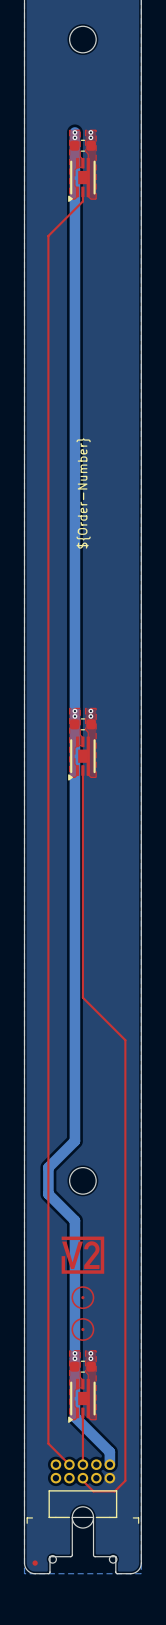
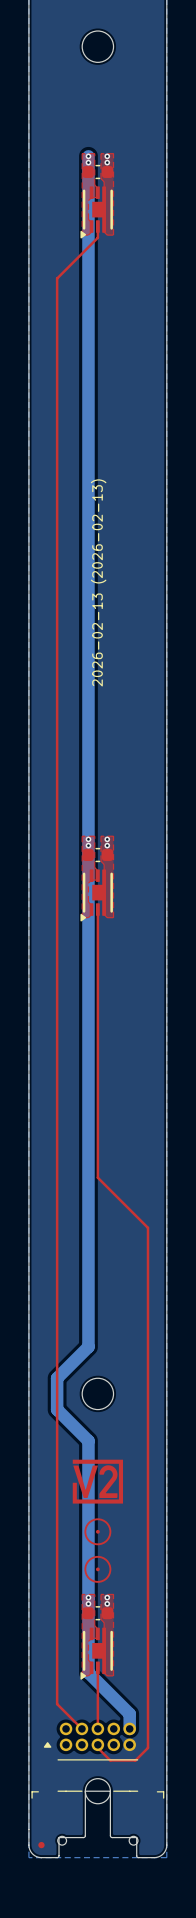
drawing shape: [76, 438, 91, 549] -> [90, 479, 107, 687]
part footprint: [48, 1459, 118, 1519] -> [43, 1722, 139, 1792]

